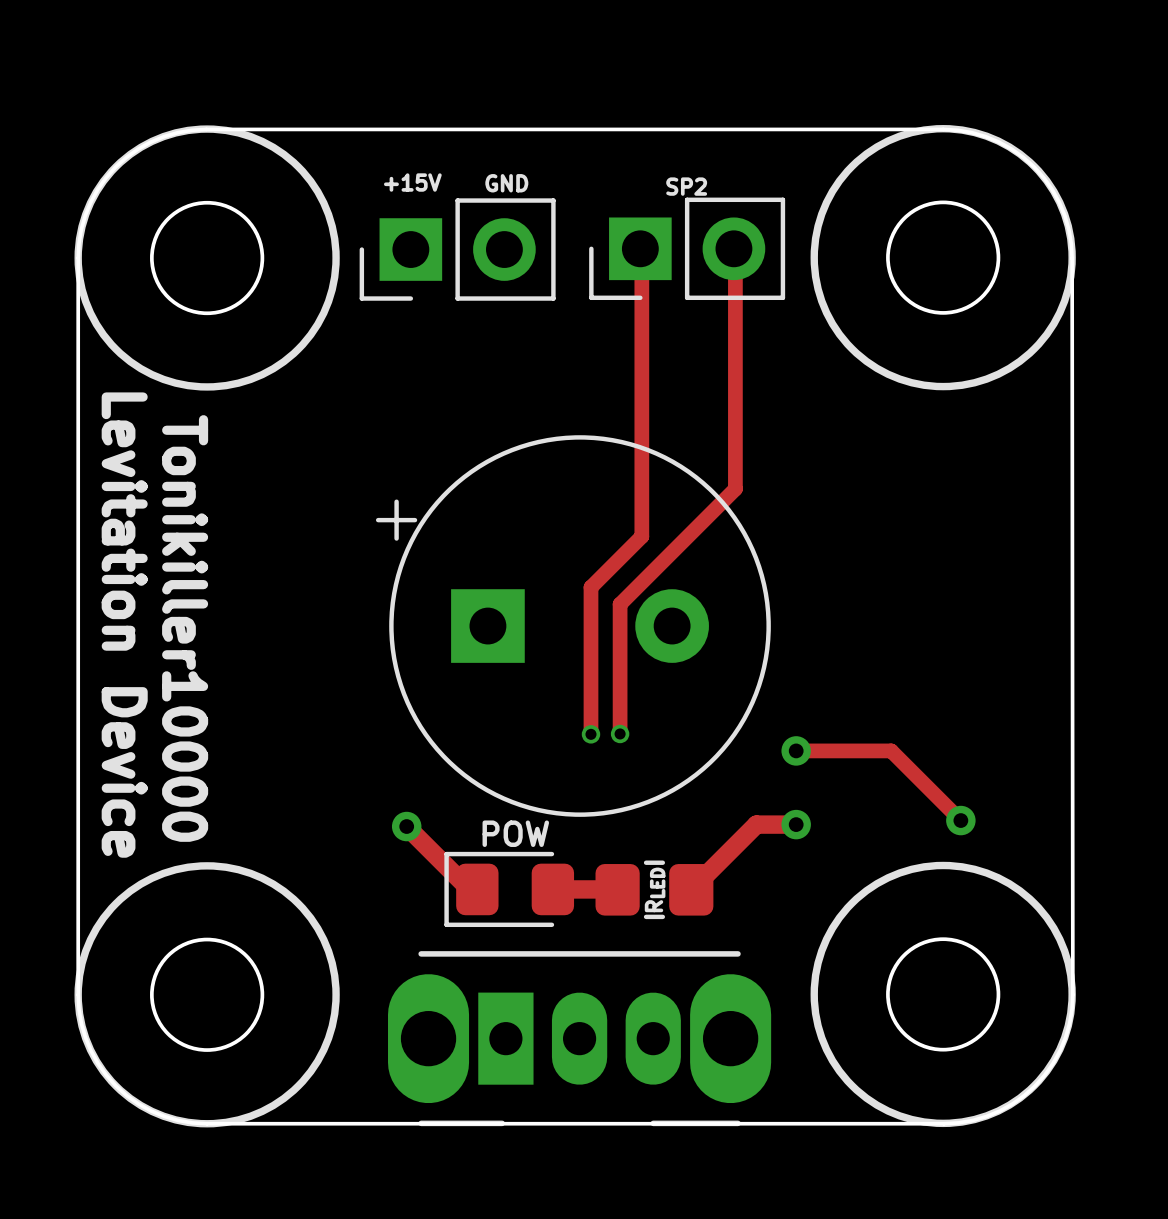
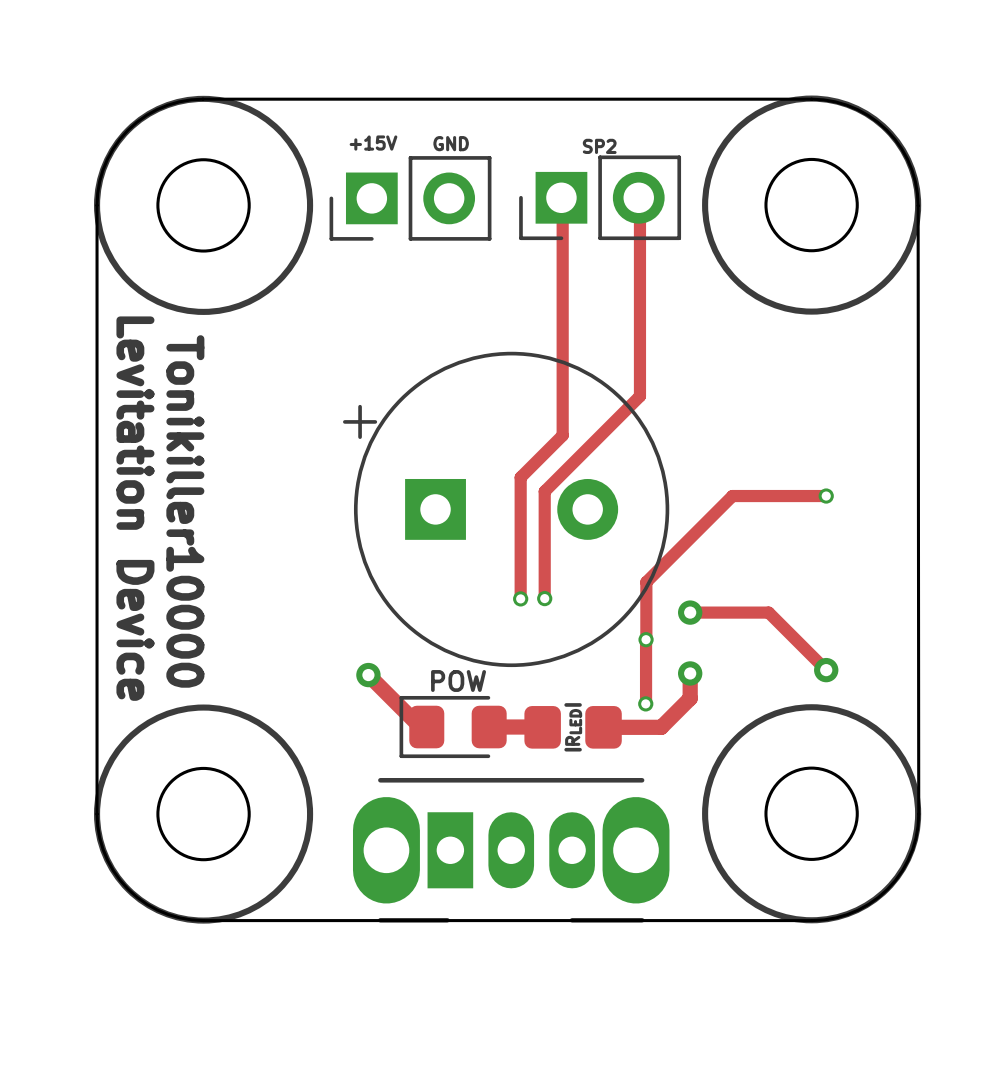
track: none -> (826, 496) (732, 496) (646, 582) (646, 639)
via: none -> (826, 496)
track: none -> (646, 639) (646, 703)
via: none -> (646, 639)
track: (796, 824) (756, 824) (691, 889) -> (690, 673) (690, 698) (661, 727) (603, 727)
via: none -> (645, 703)

